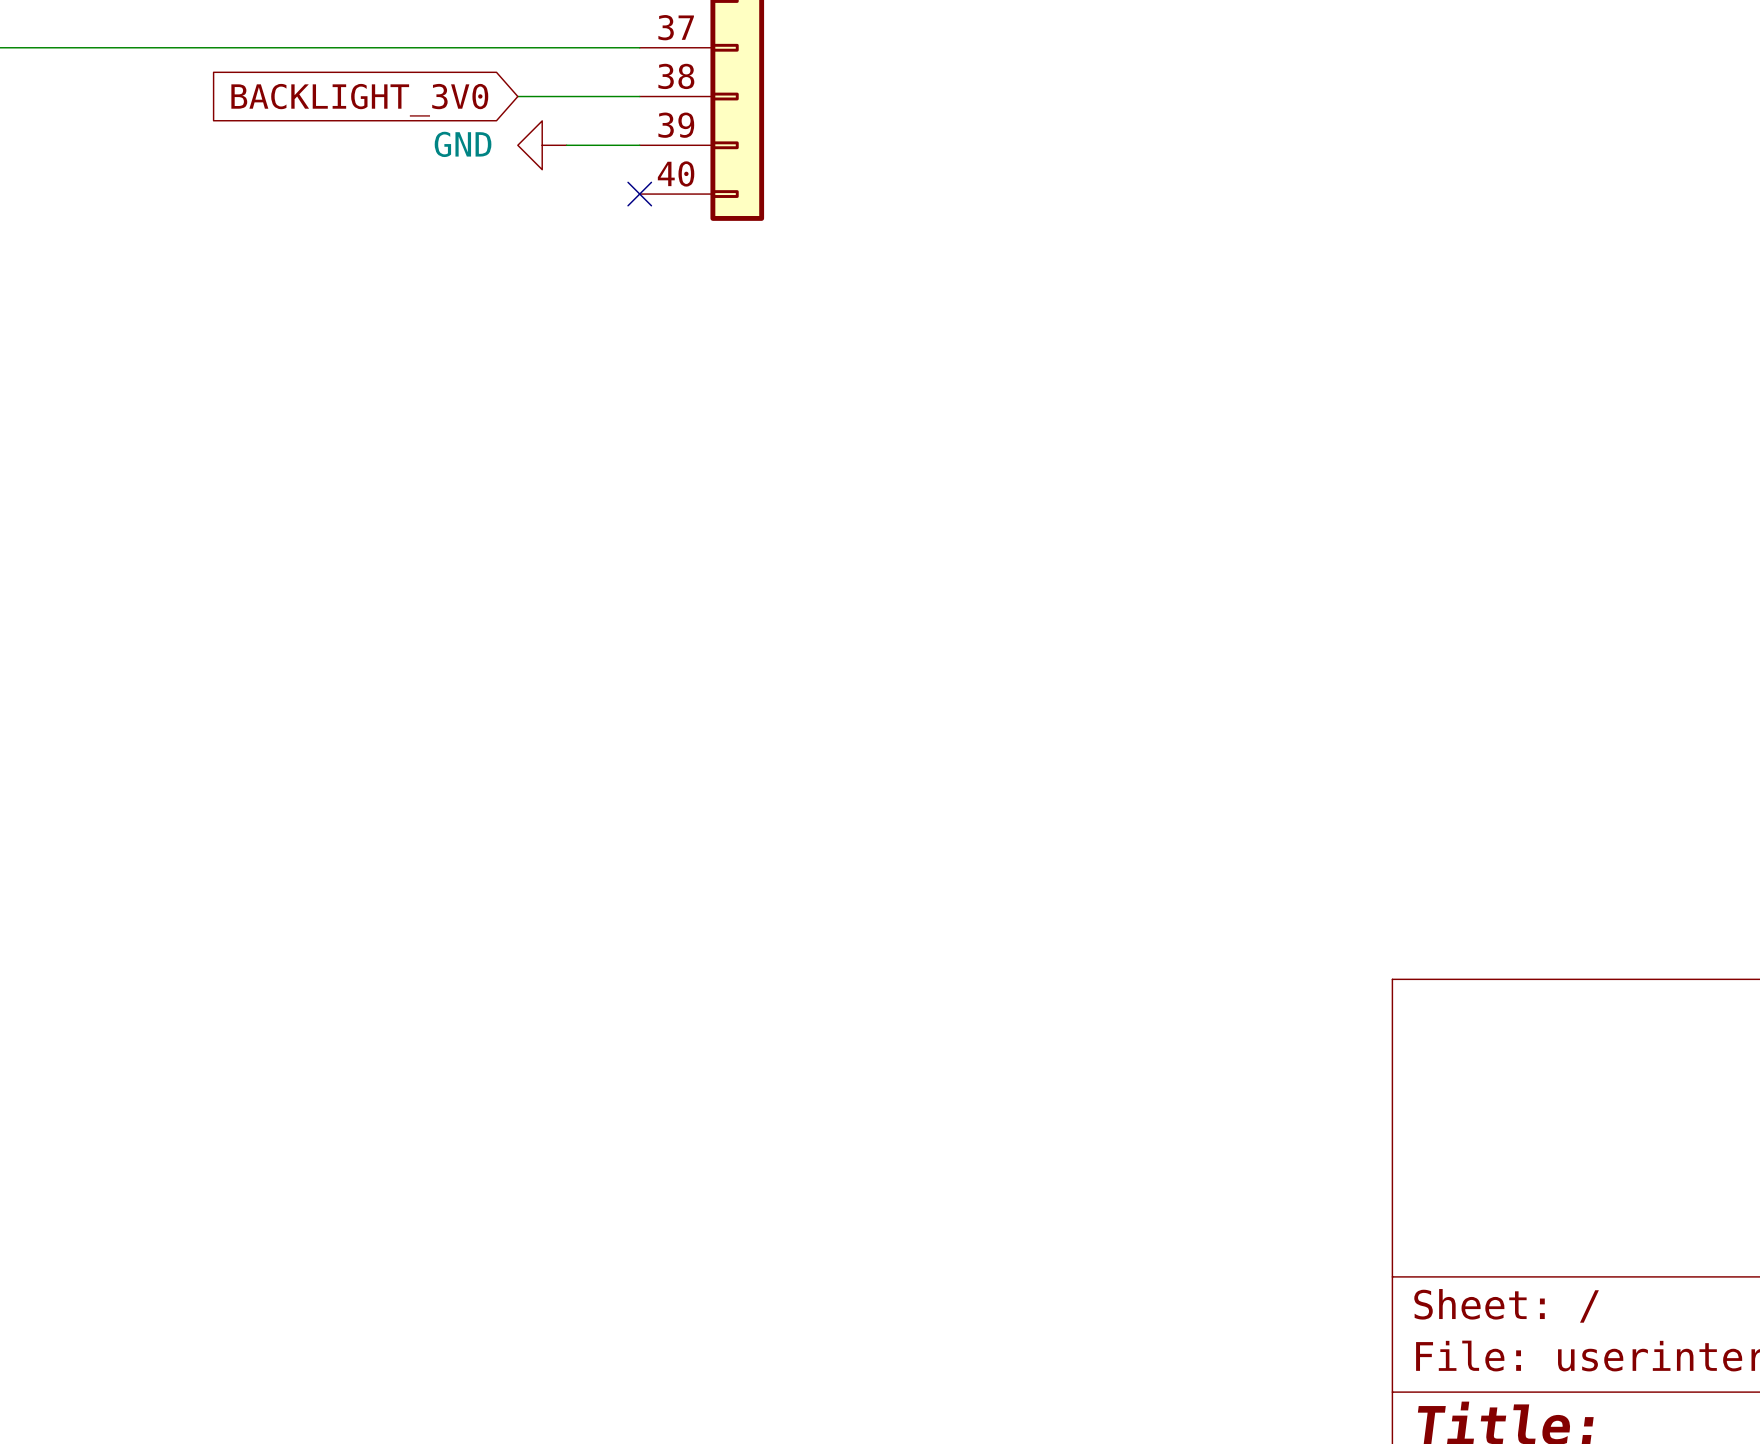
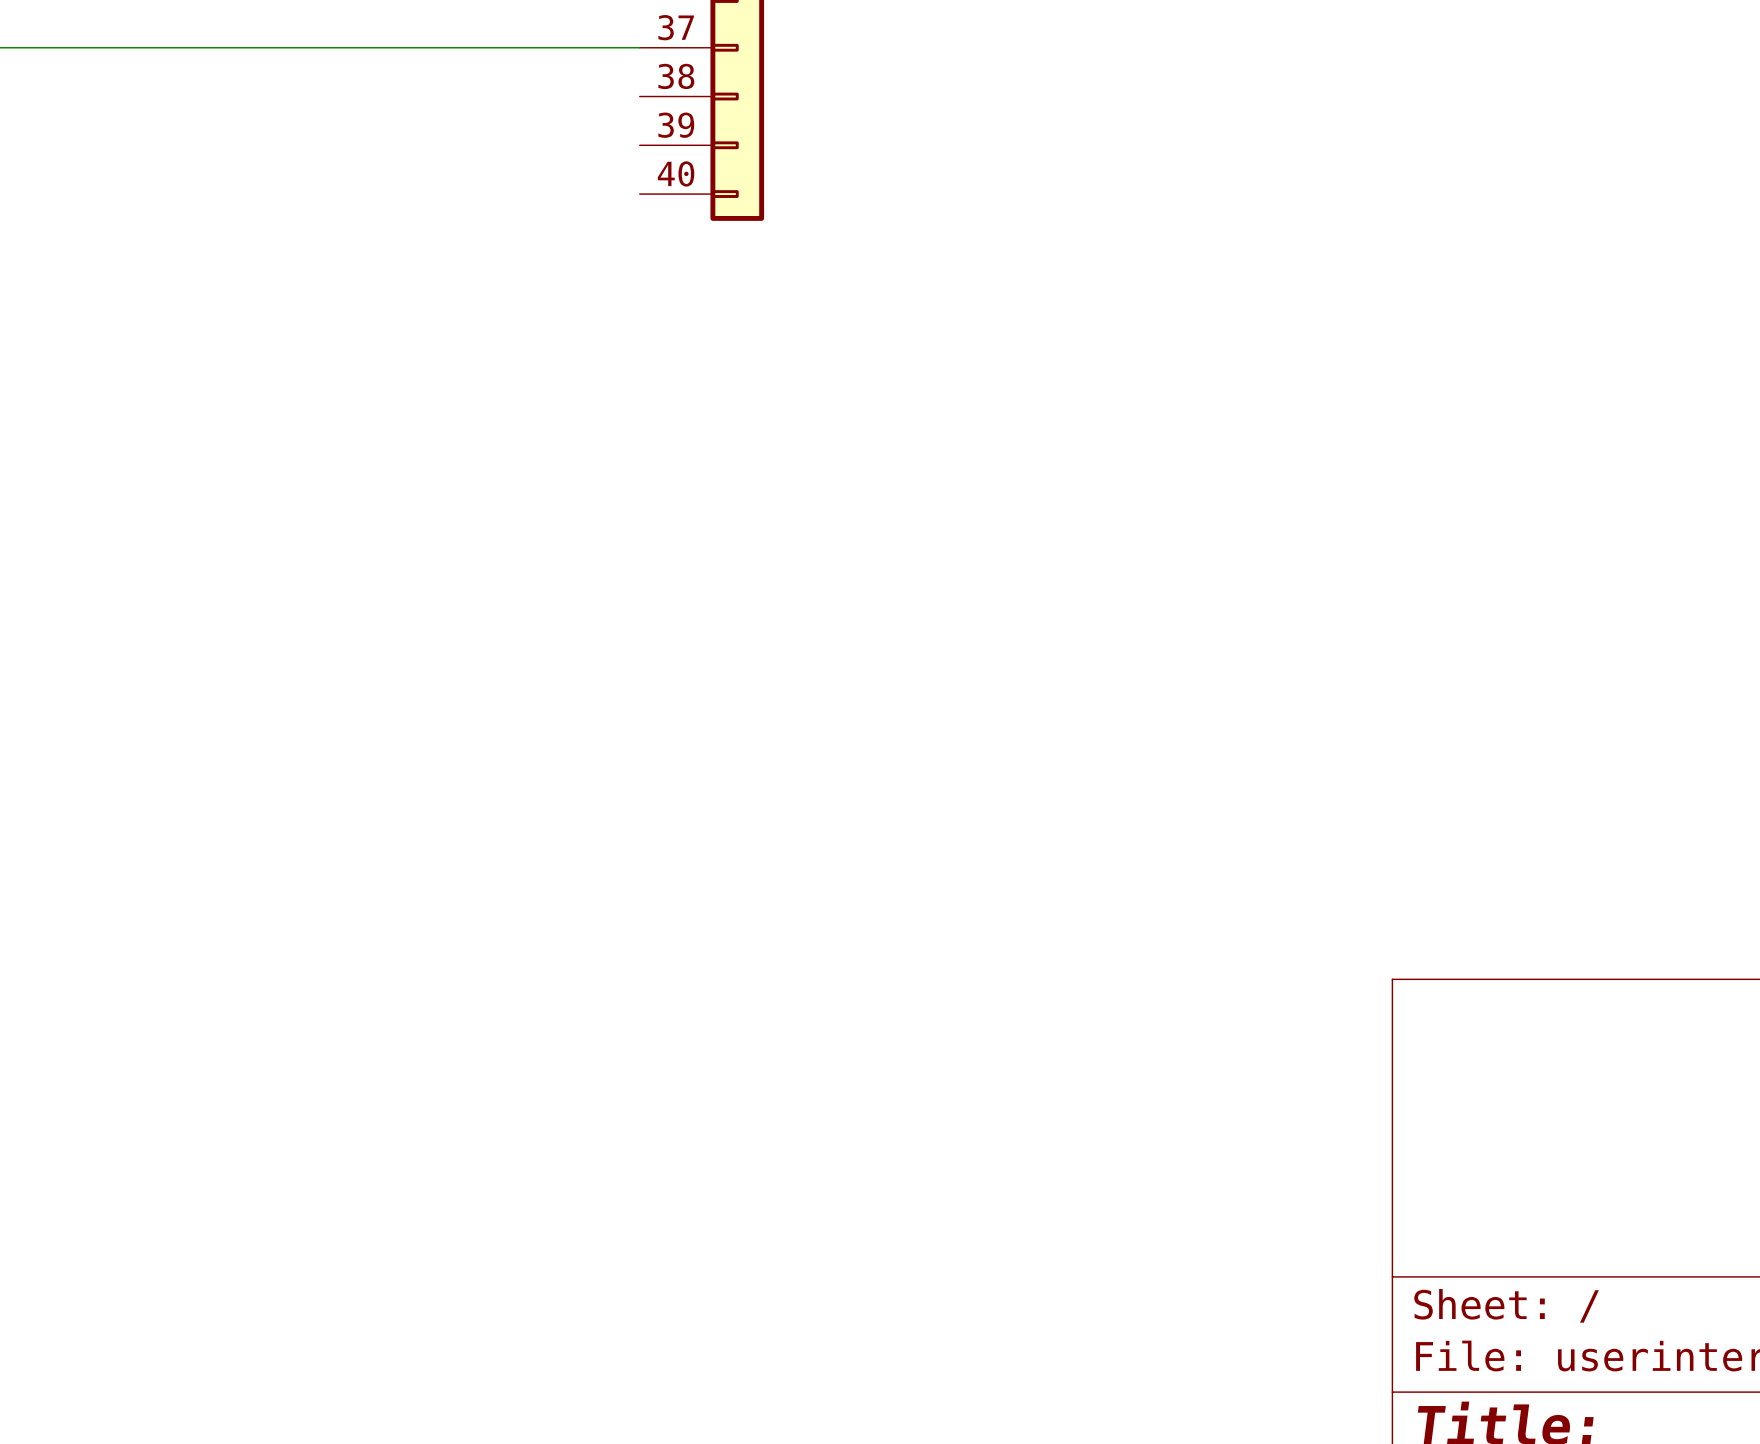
wire: (517, 96) (639, 96) -> none
global label: BACKLIGHT_3V0 (359, 100) -> none
power symbol: GND (542, 145) -> none
wire: (566, 145) (639, 145) -> none
no-connect mark: (639, 194) -> none

